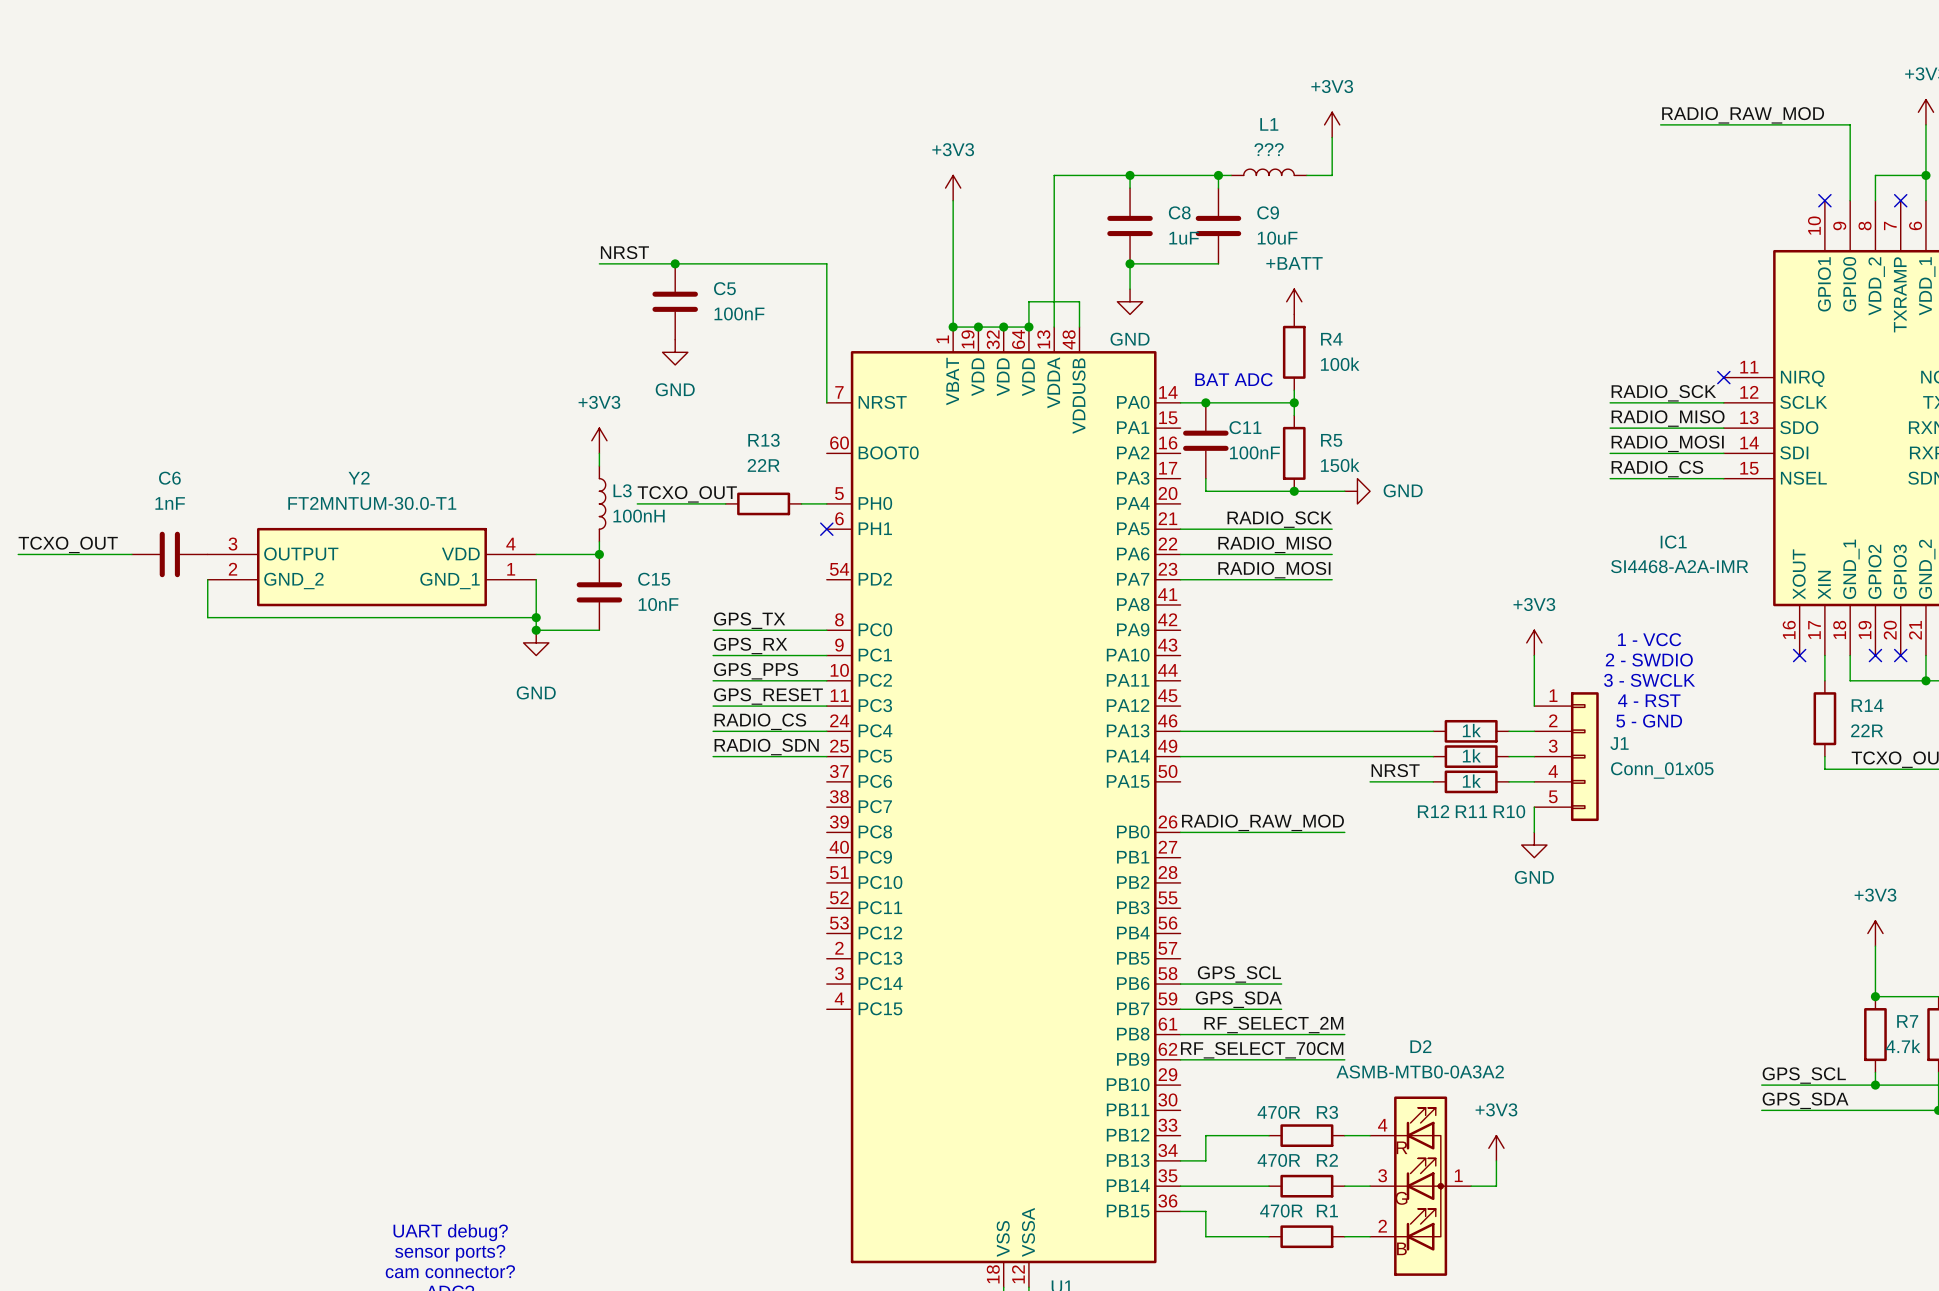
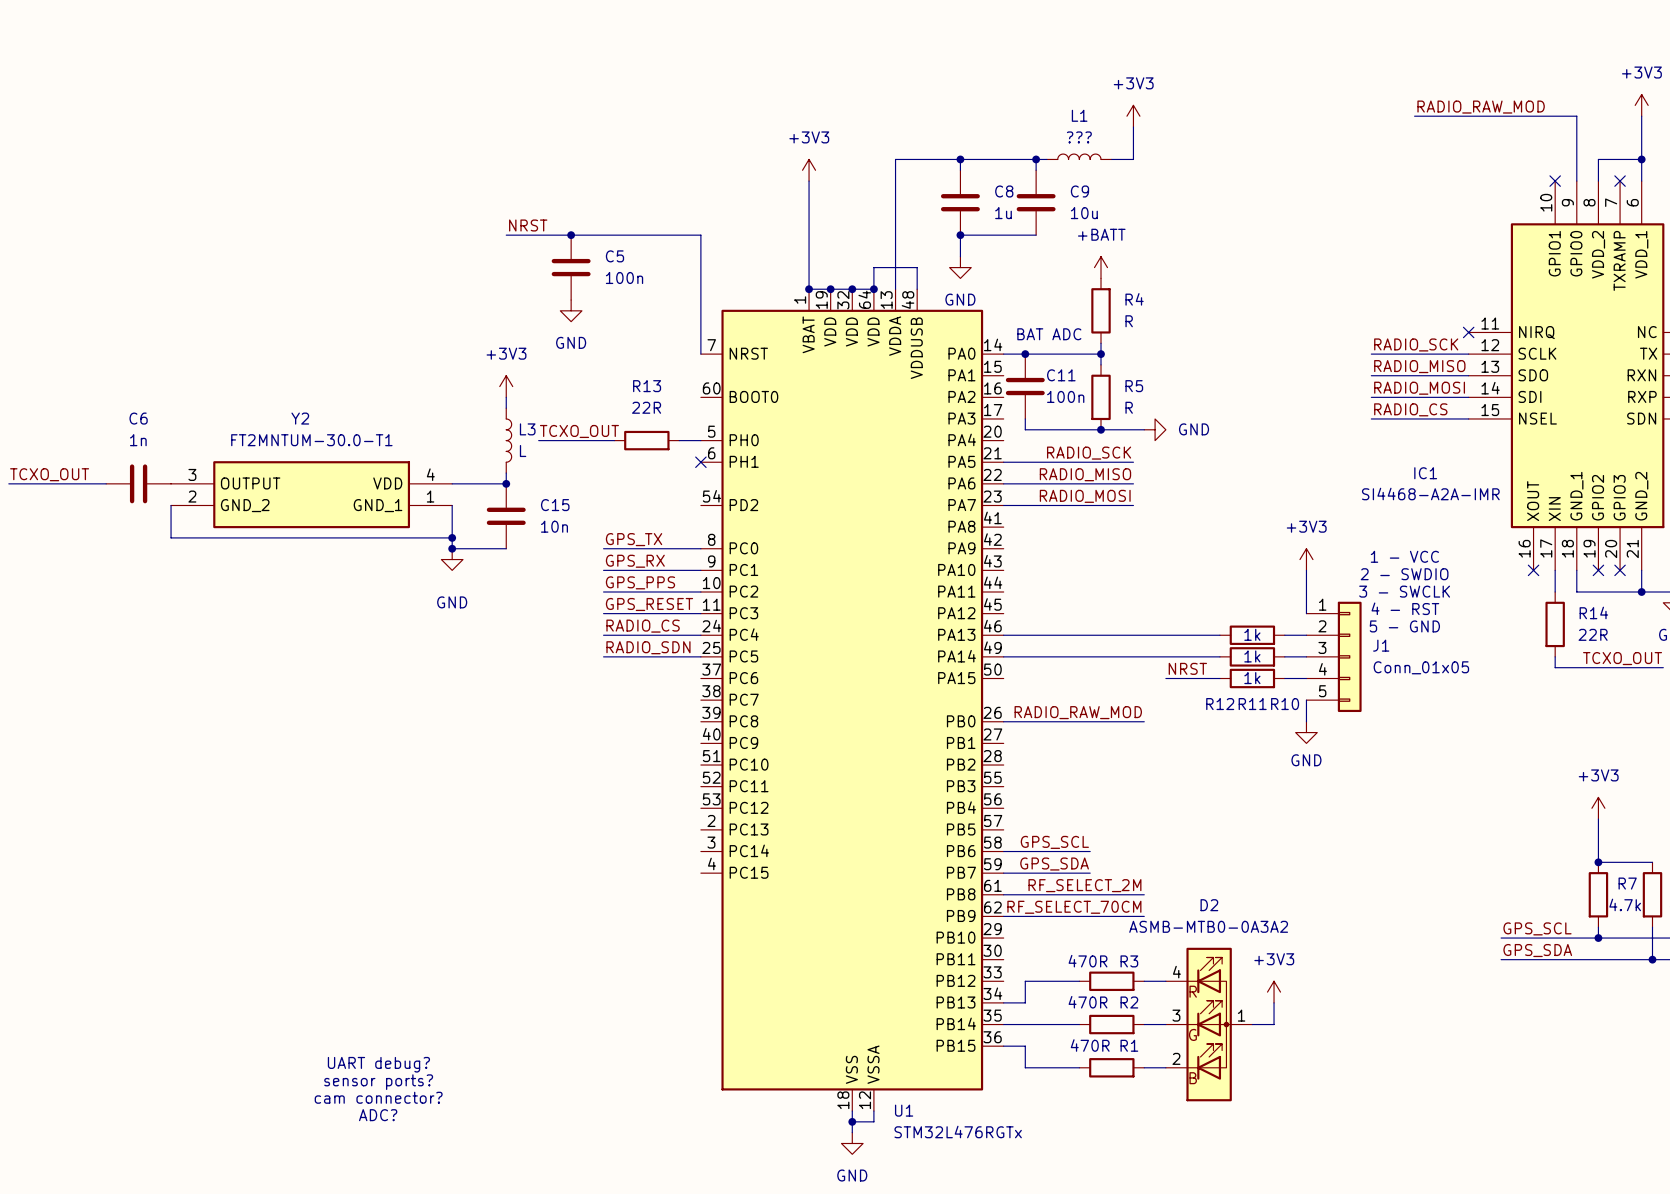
C8 value: 1uF (1184, 238) -> 1u (1003, 213)
C9 value: 10uF (1277, 238) -> 10u (1084, 213)
C5 value: 100nF (739, 313) -> 100n (624, 278)
R4 value: 100k (1340, 364) -> R (1129, 321)
C11 value: 100nF (1254, 452) -> 100n (1065, 396)
R5 value: 150k (1340, 465) -> R (1129, 407)
C6 value: 1nF (170, 503) -> 1n (138, 440)
L3 value: 100nH (639, 516) -> L (523, 451)
C15 value: 10nF (658, 604) -> 10n (554, 526)

